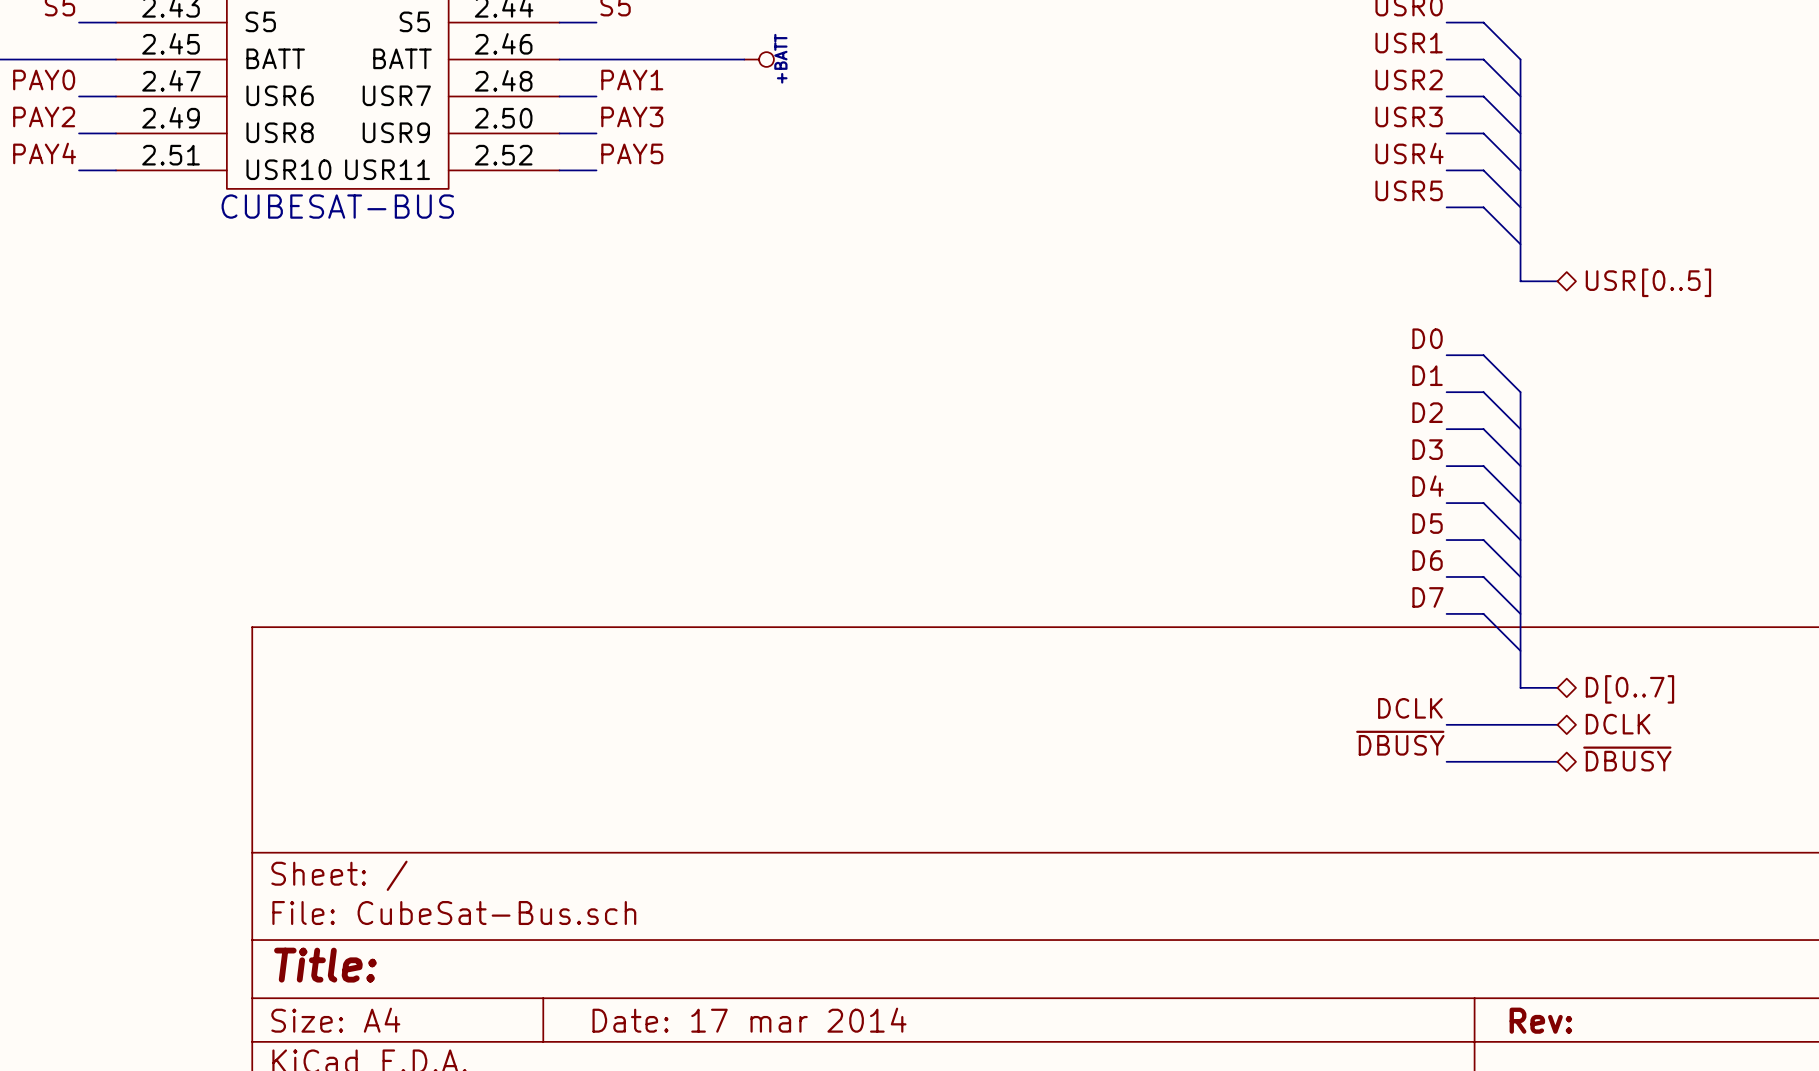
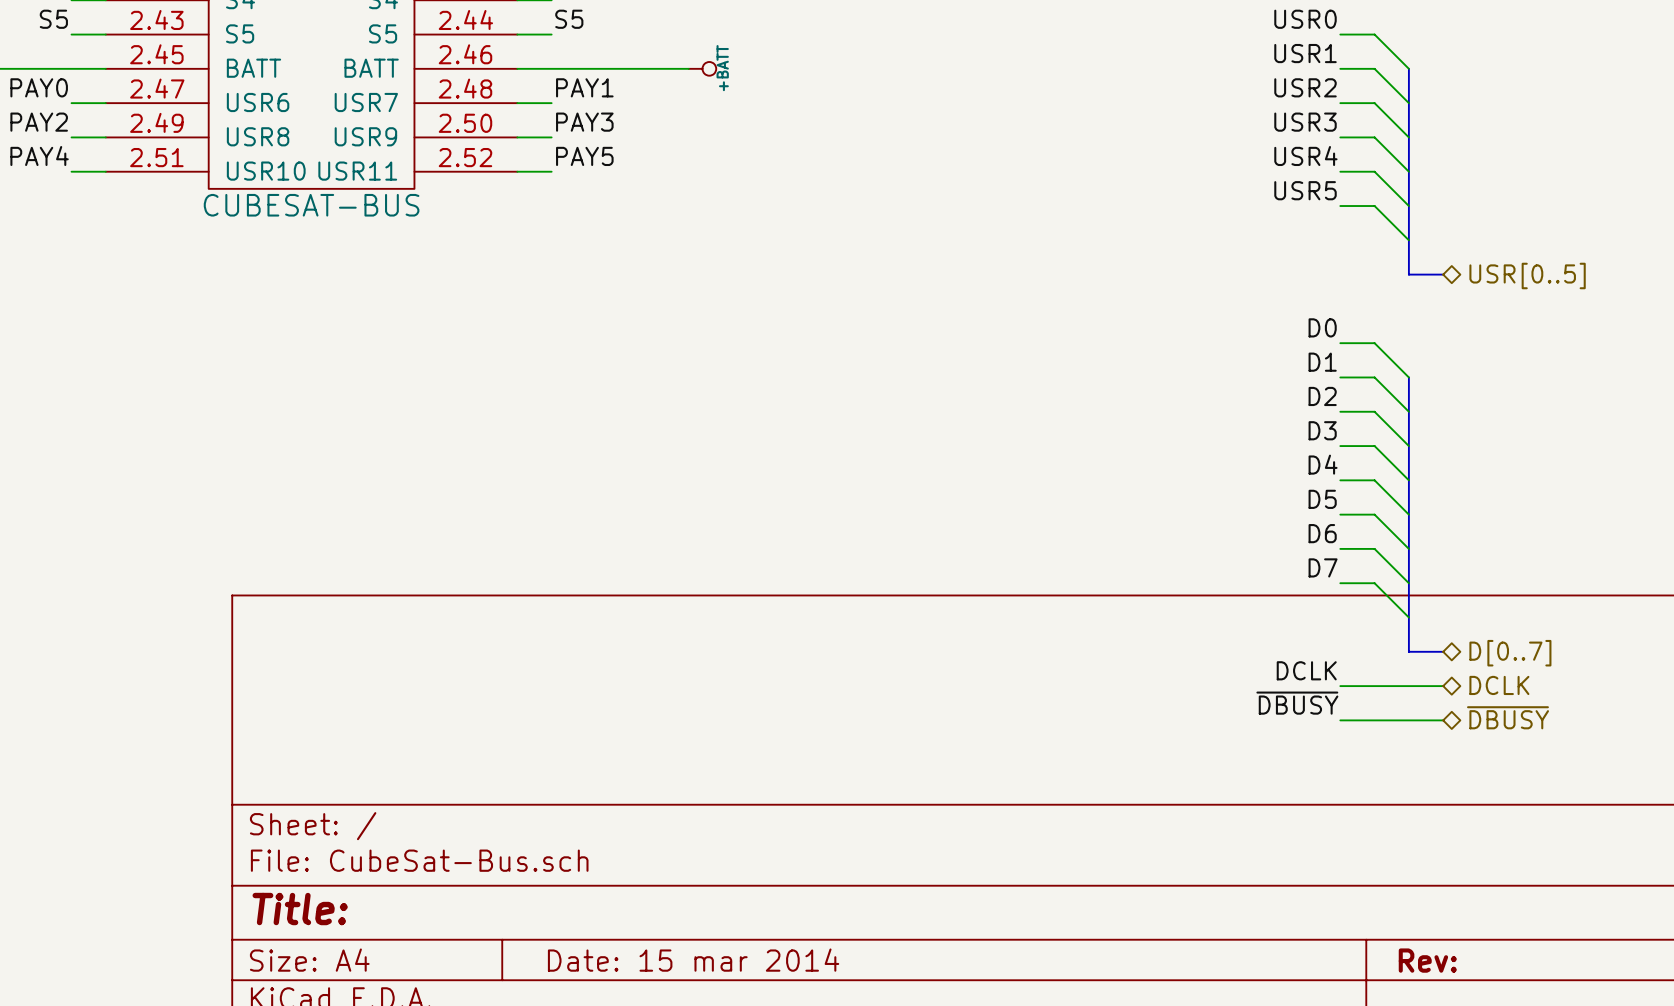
title block: Date: 17 mar 2014 (749, 1020) -> Date: 15 mar 2014 (693, 960)

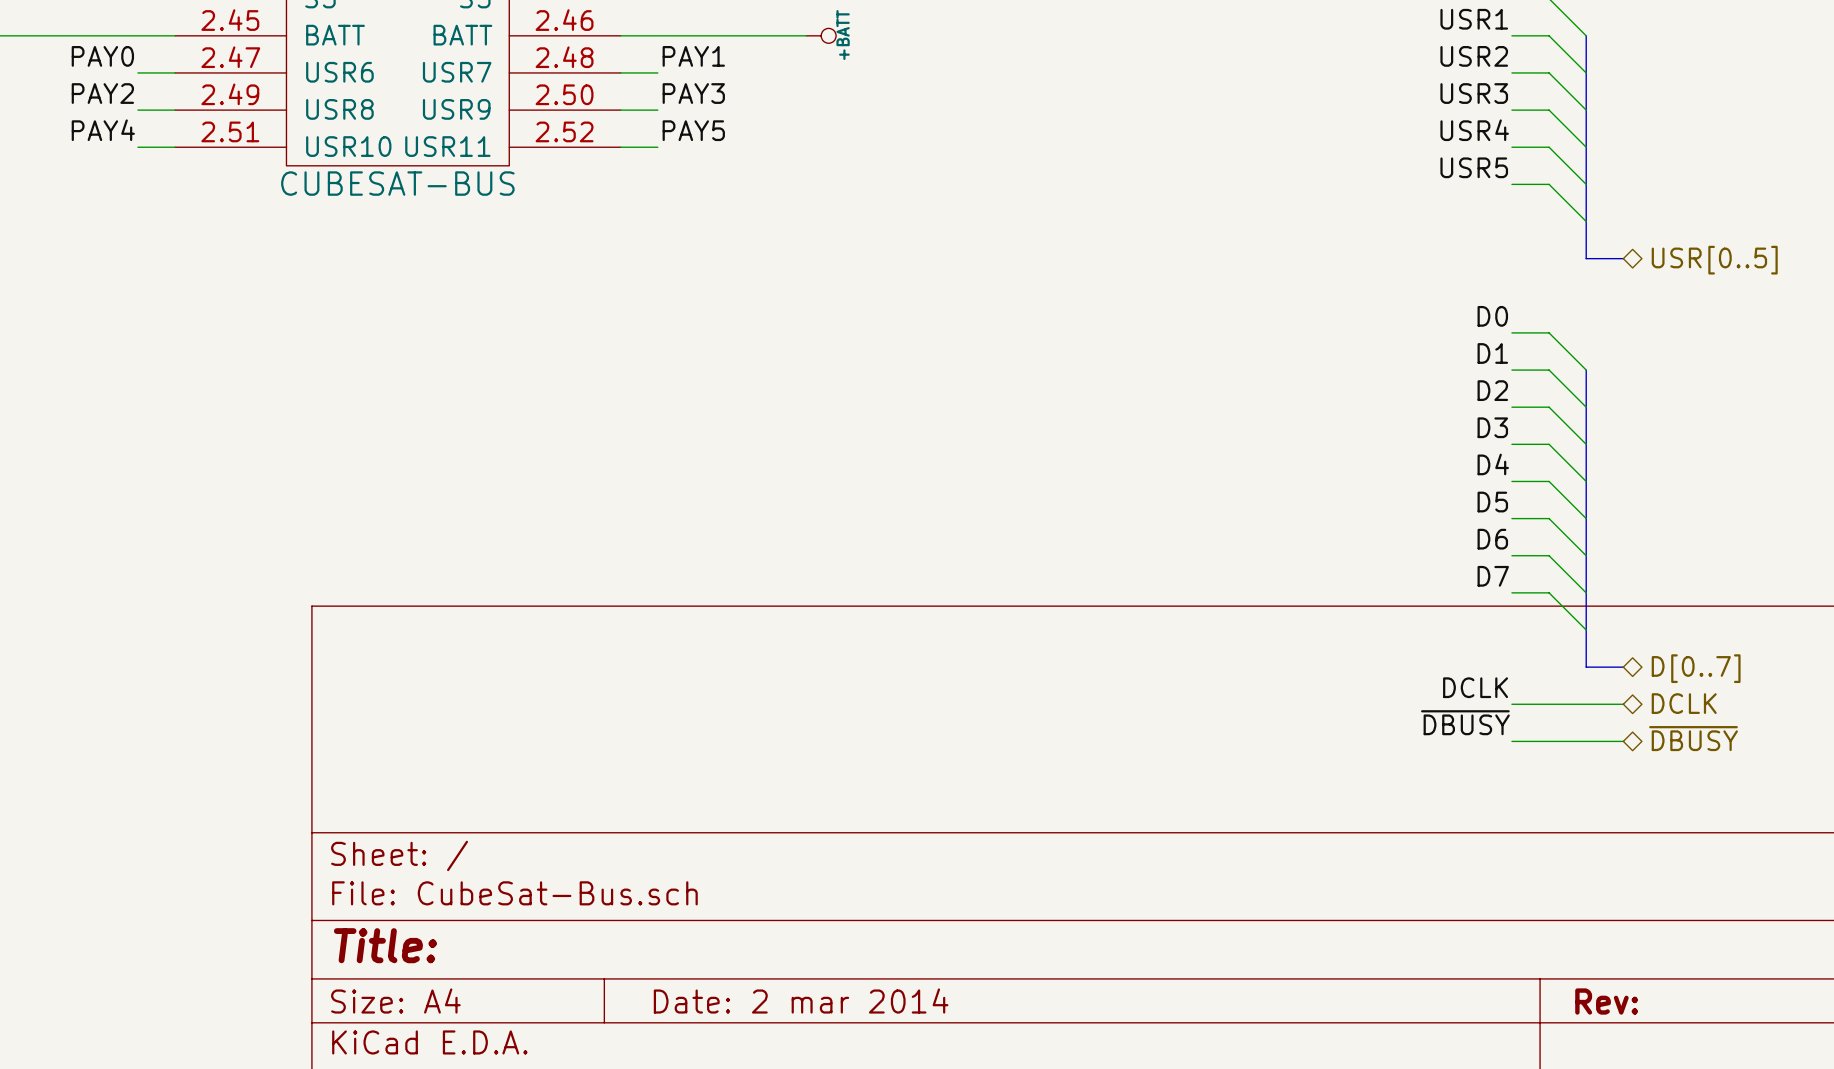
title block: Date: 15 mar 2014 (693, 960) -> Date: 2 mar 2014 (801, 1001)

